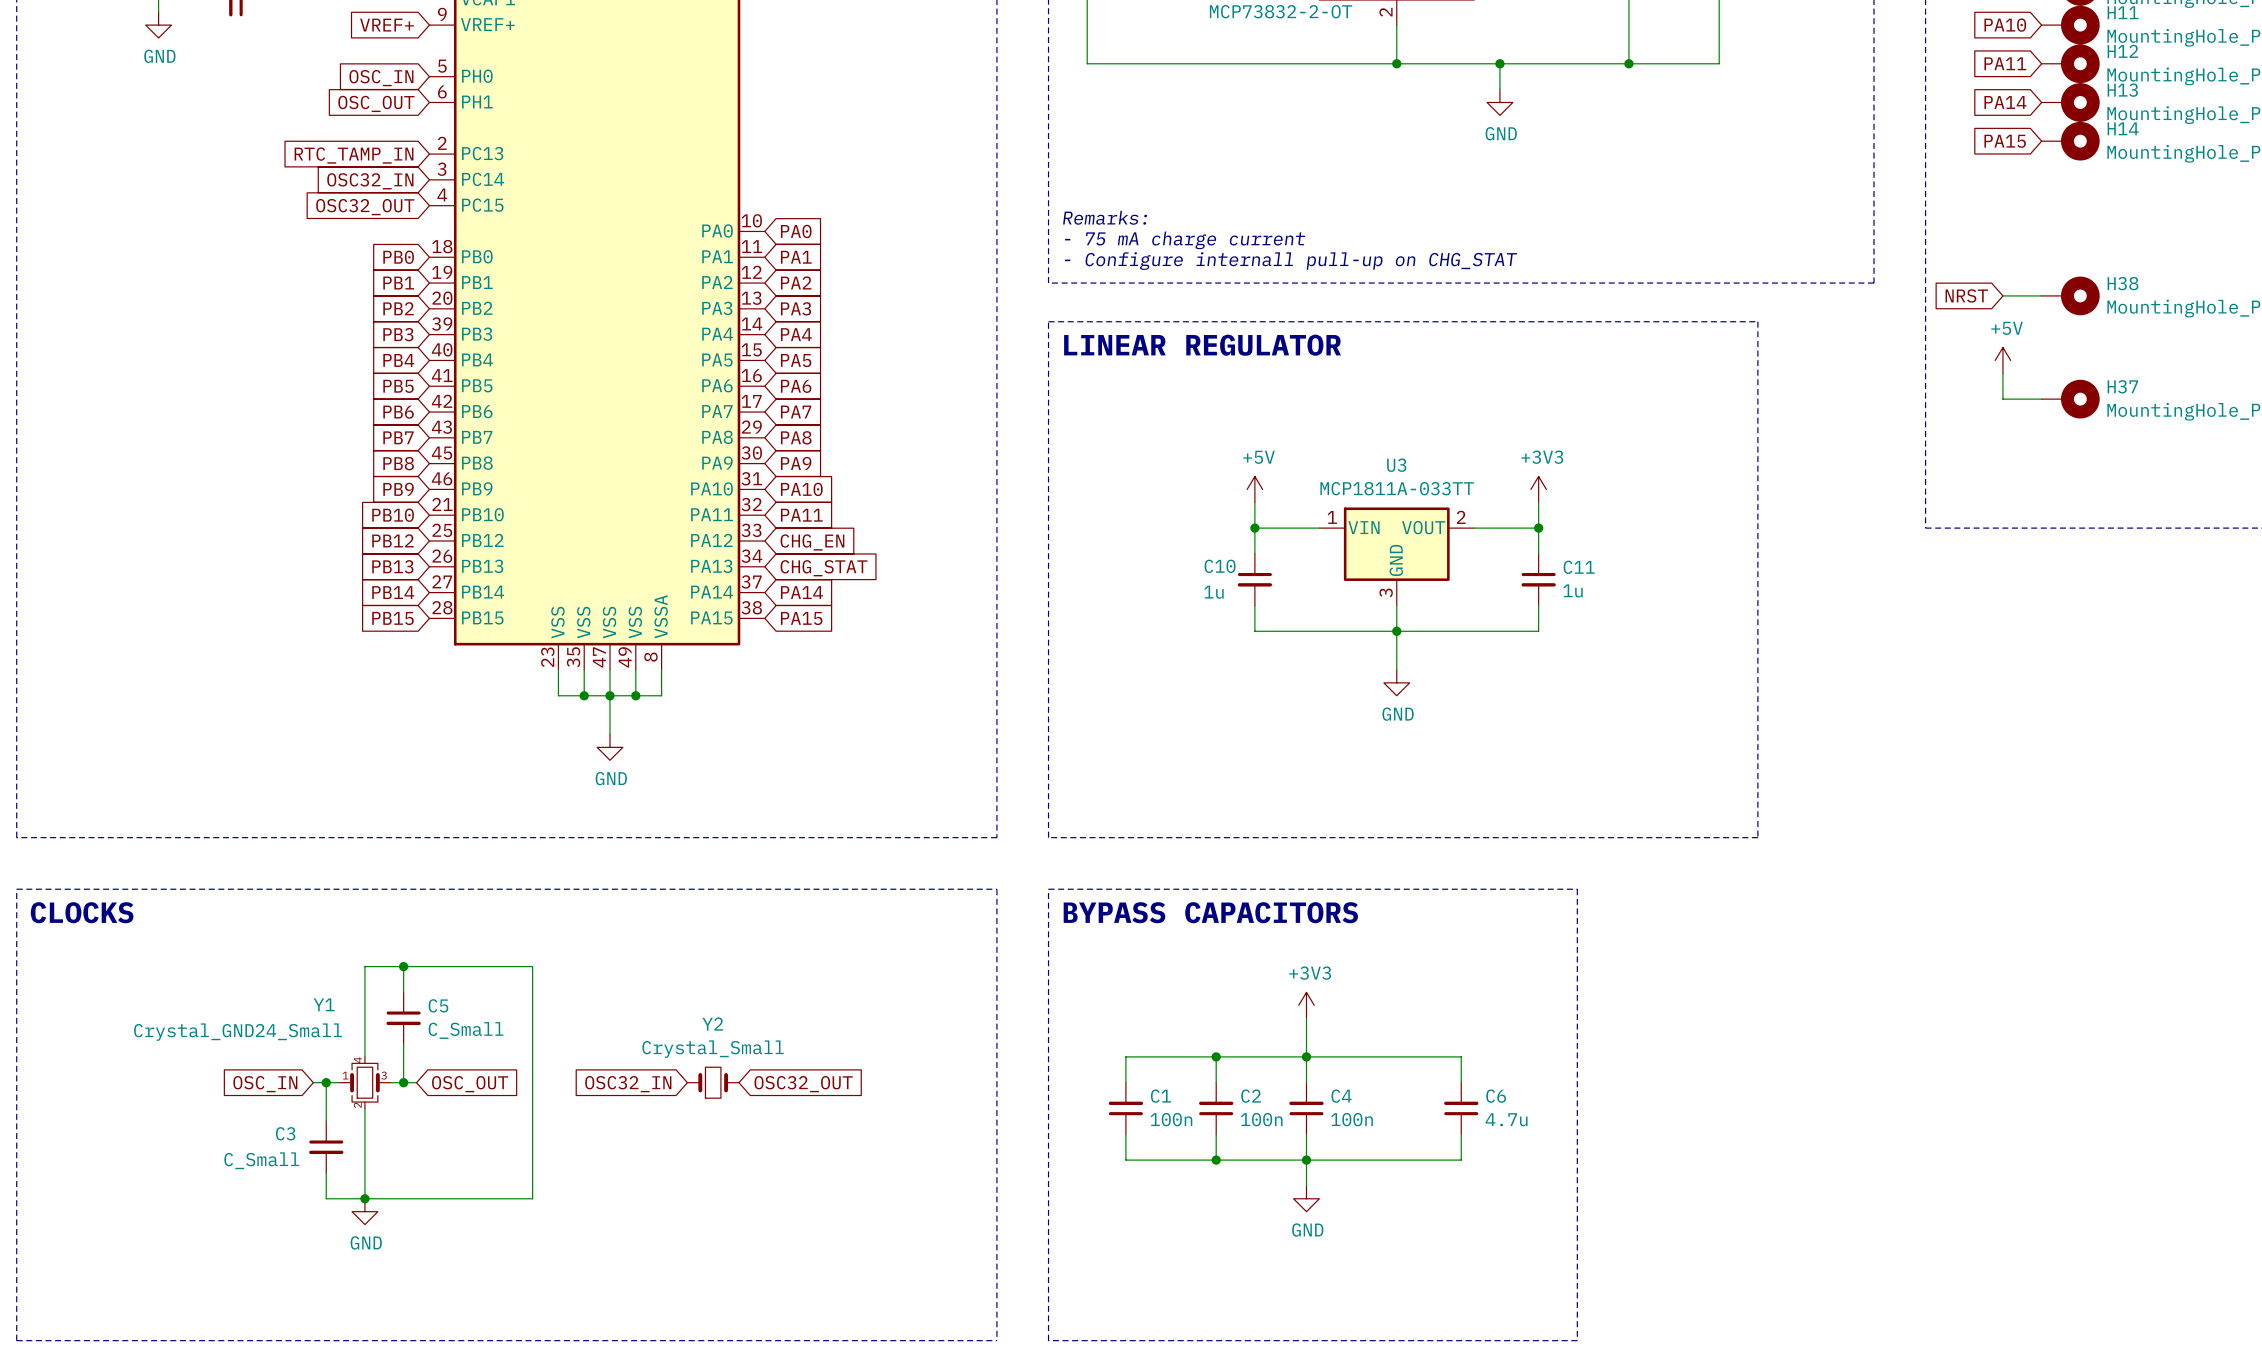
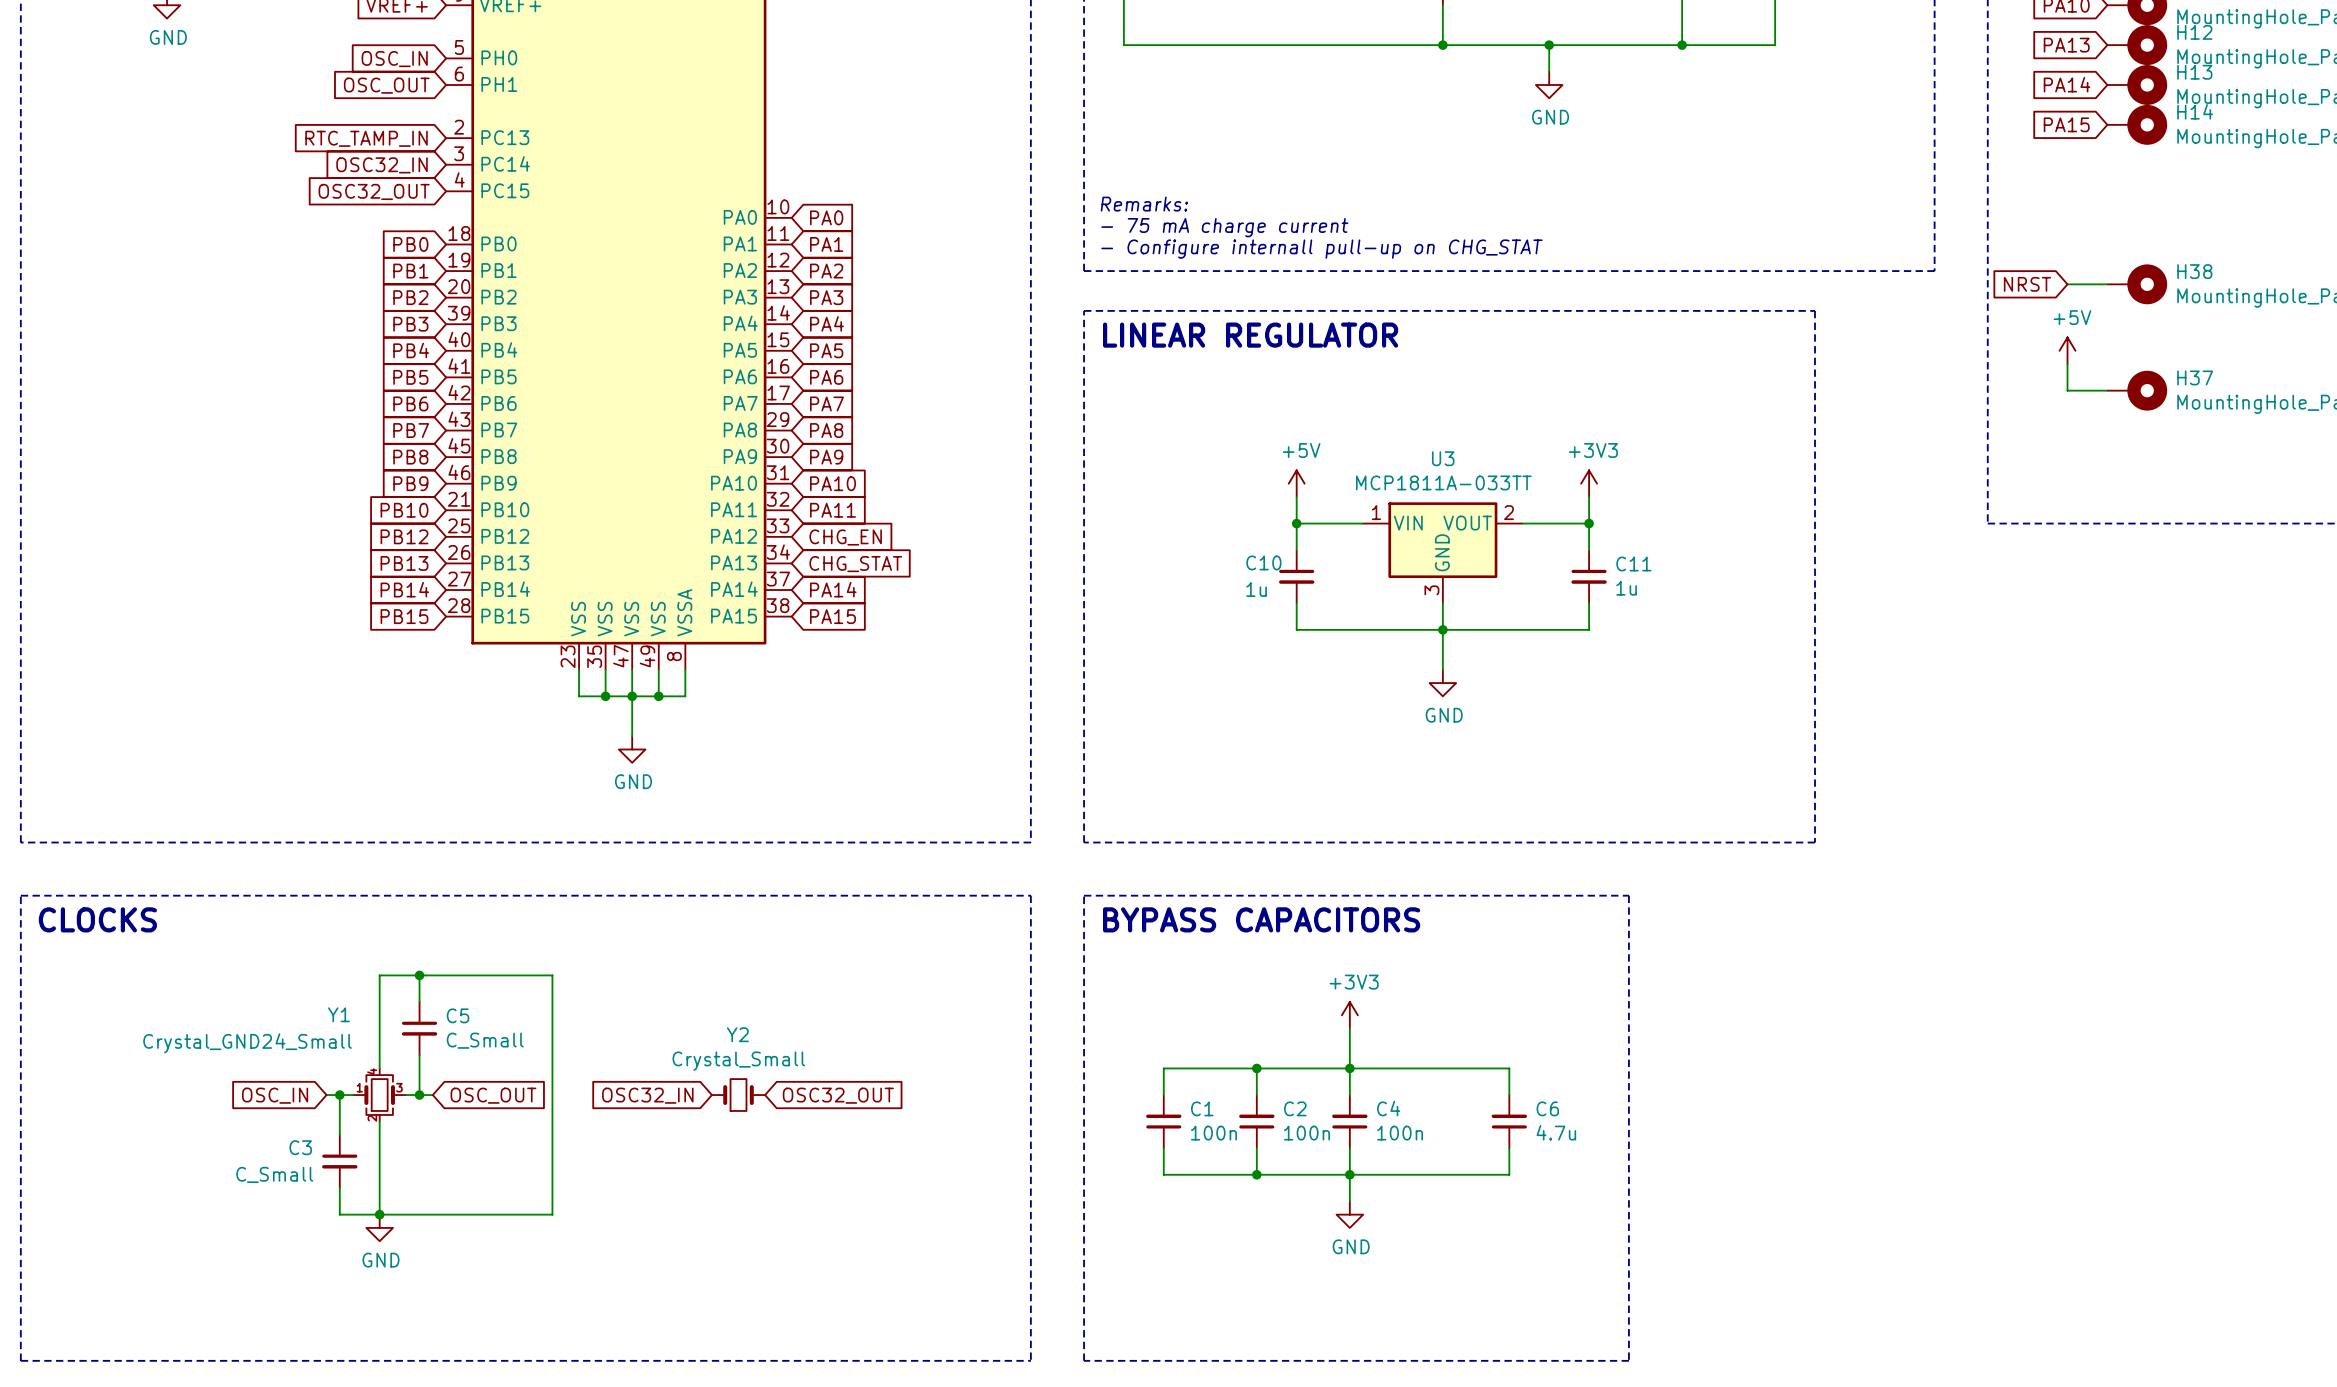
global label: PA11 (2005, 63) -> PA13 (2066, 45)

